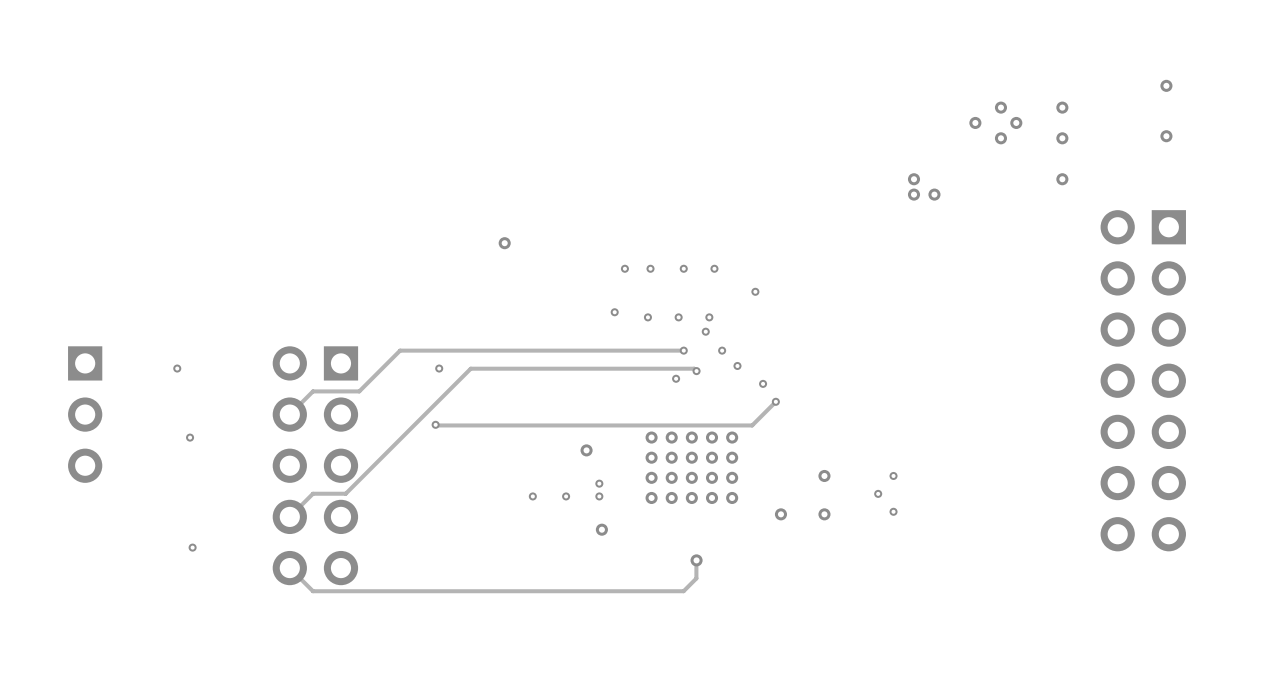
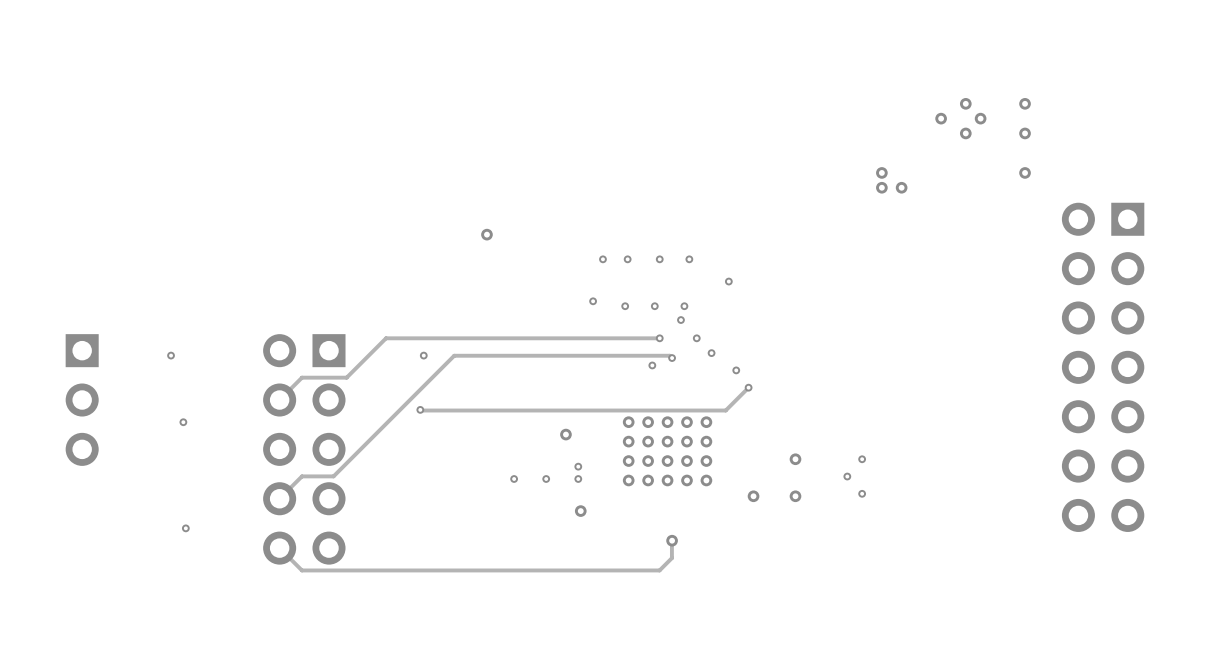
via: (1166, 85) -> none
via: (1166, 136) -> none

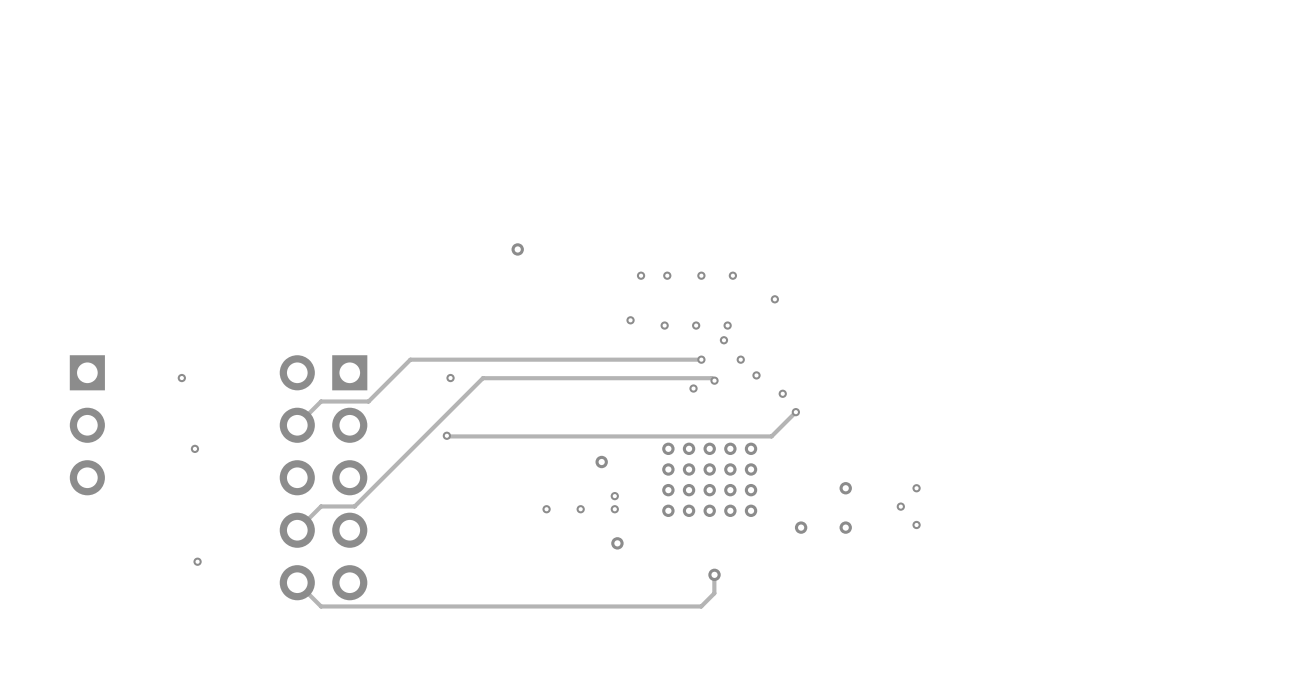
via: (965, 103) -> none
via: (1025, 103) -> none
via: (941, 118) -> none
via: (980, 118) -> none
via: (965, 133) -> none
via: (1025, 133) -> none
via: (881, 172) -> none
via: (1025, 172) -> none
via: (881, 187) -> none
via: (901, 187) -> none
part: (1103, 367) -> none

